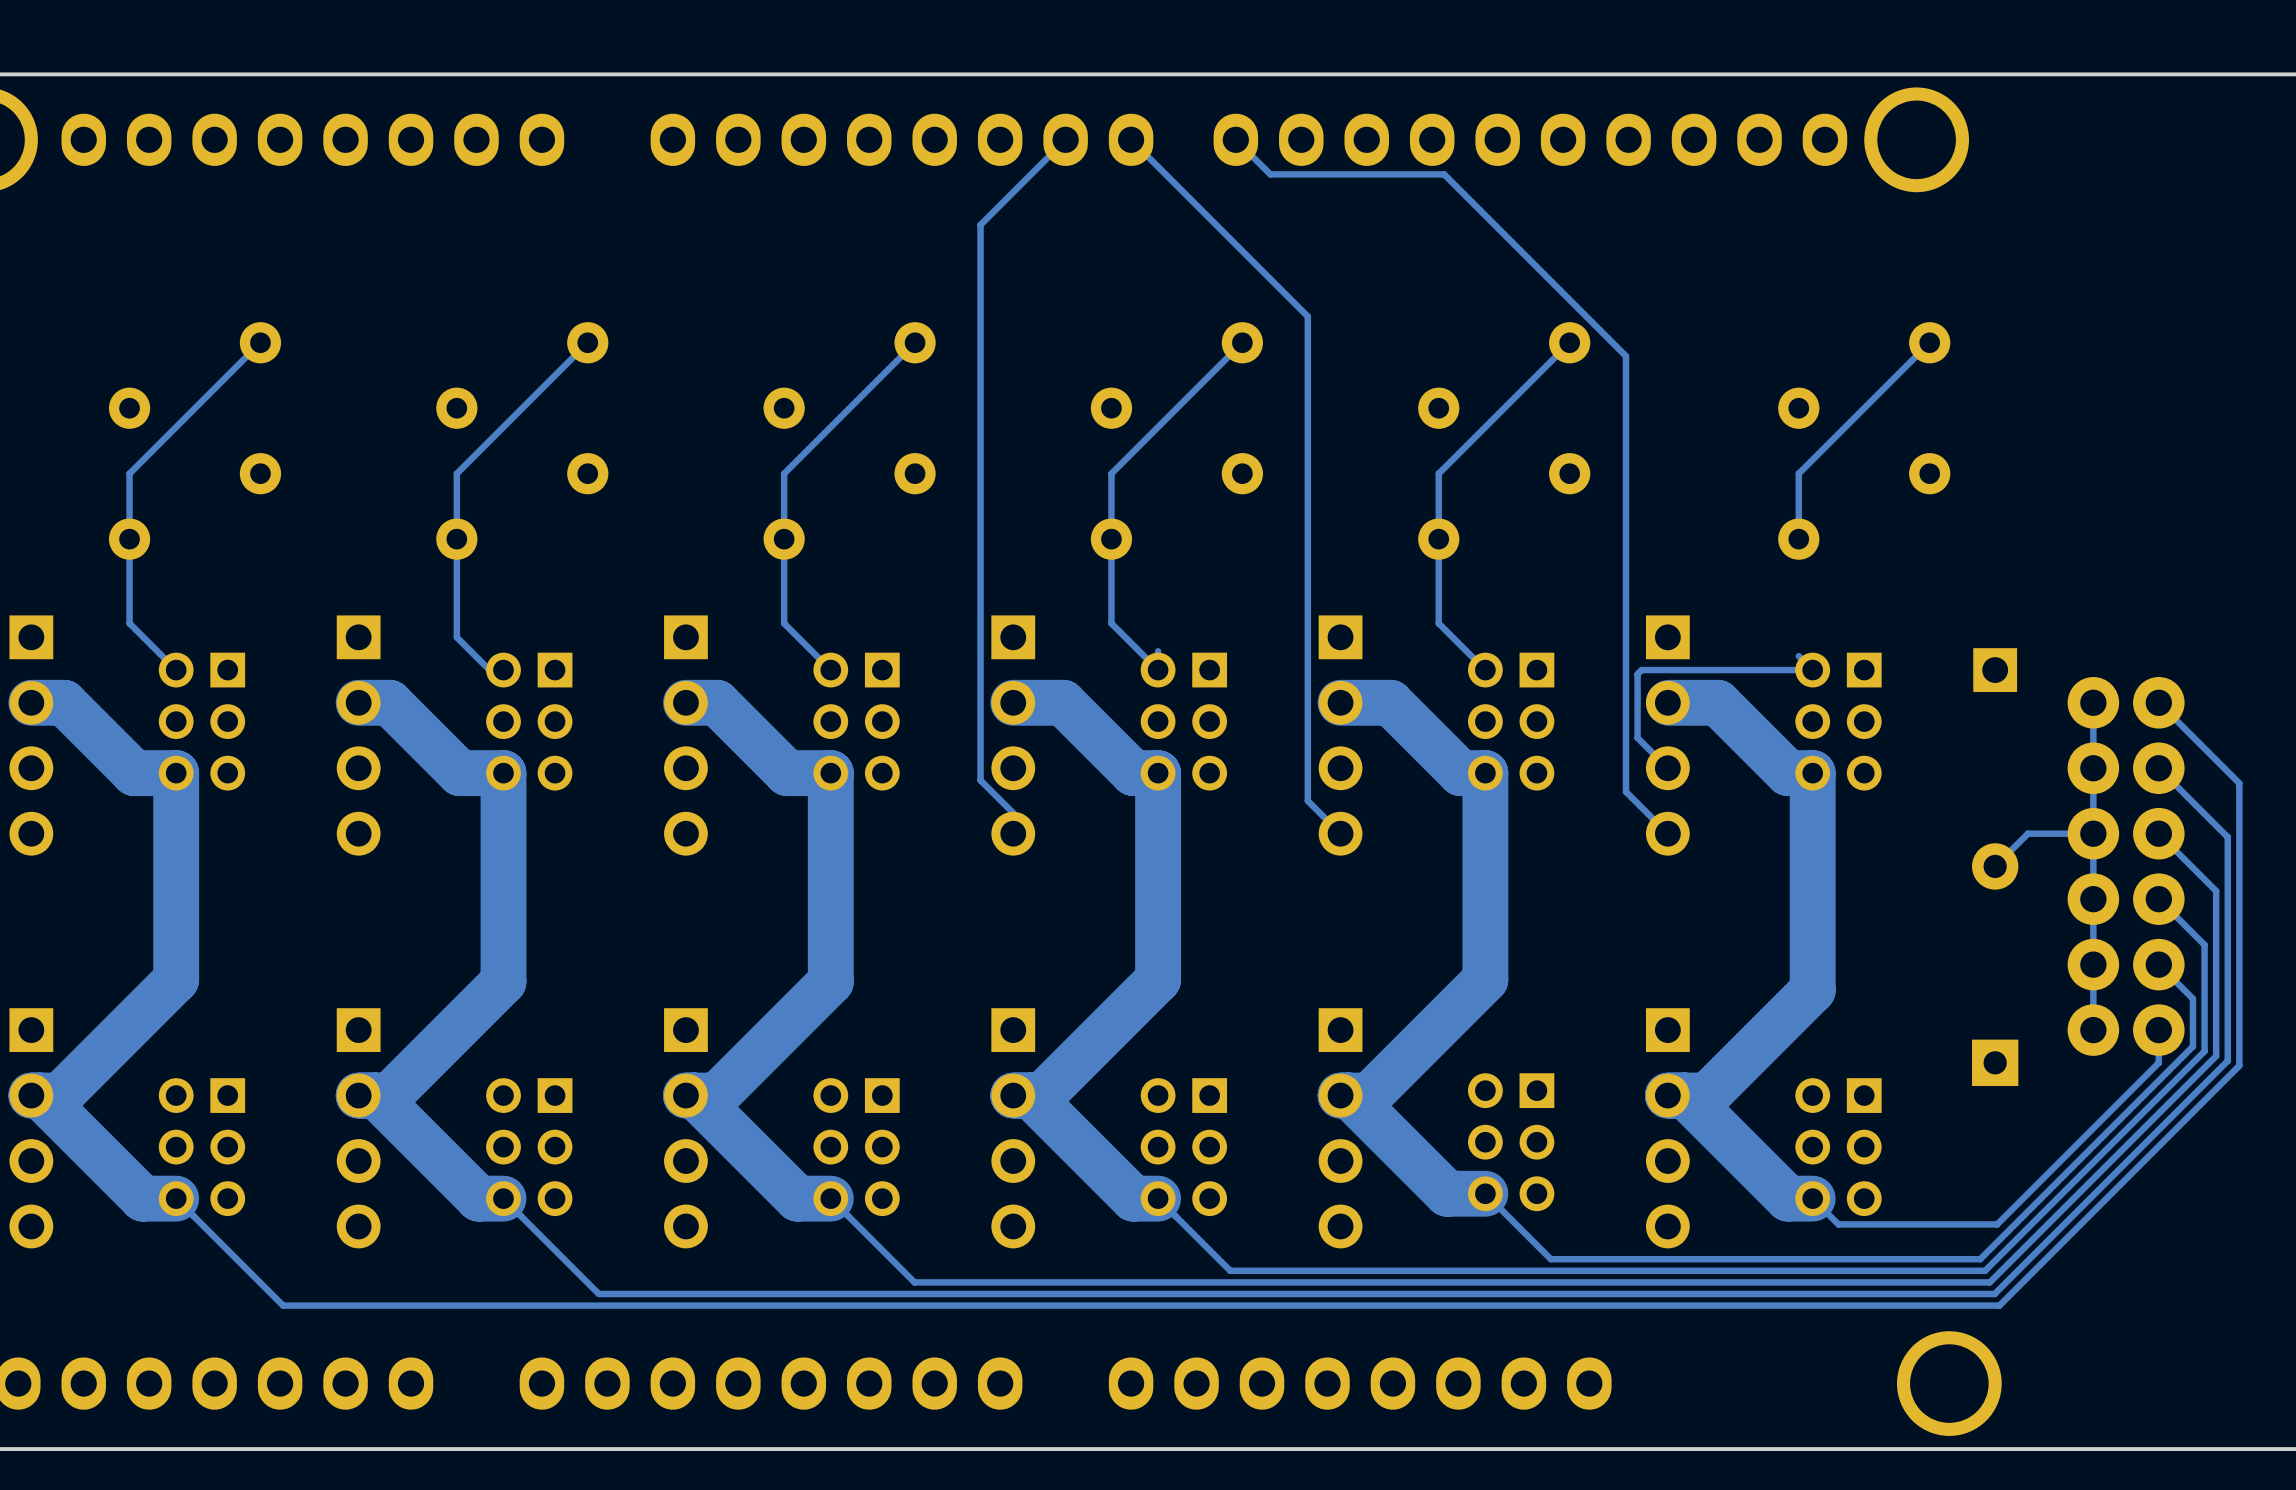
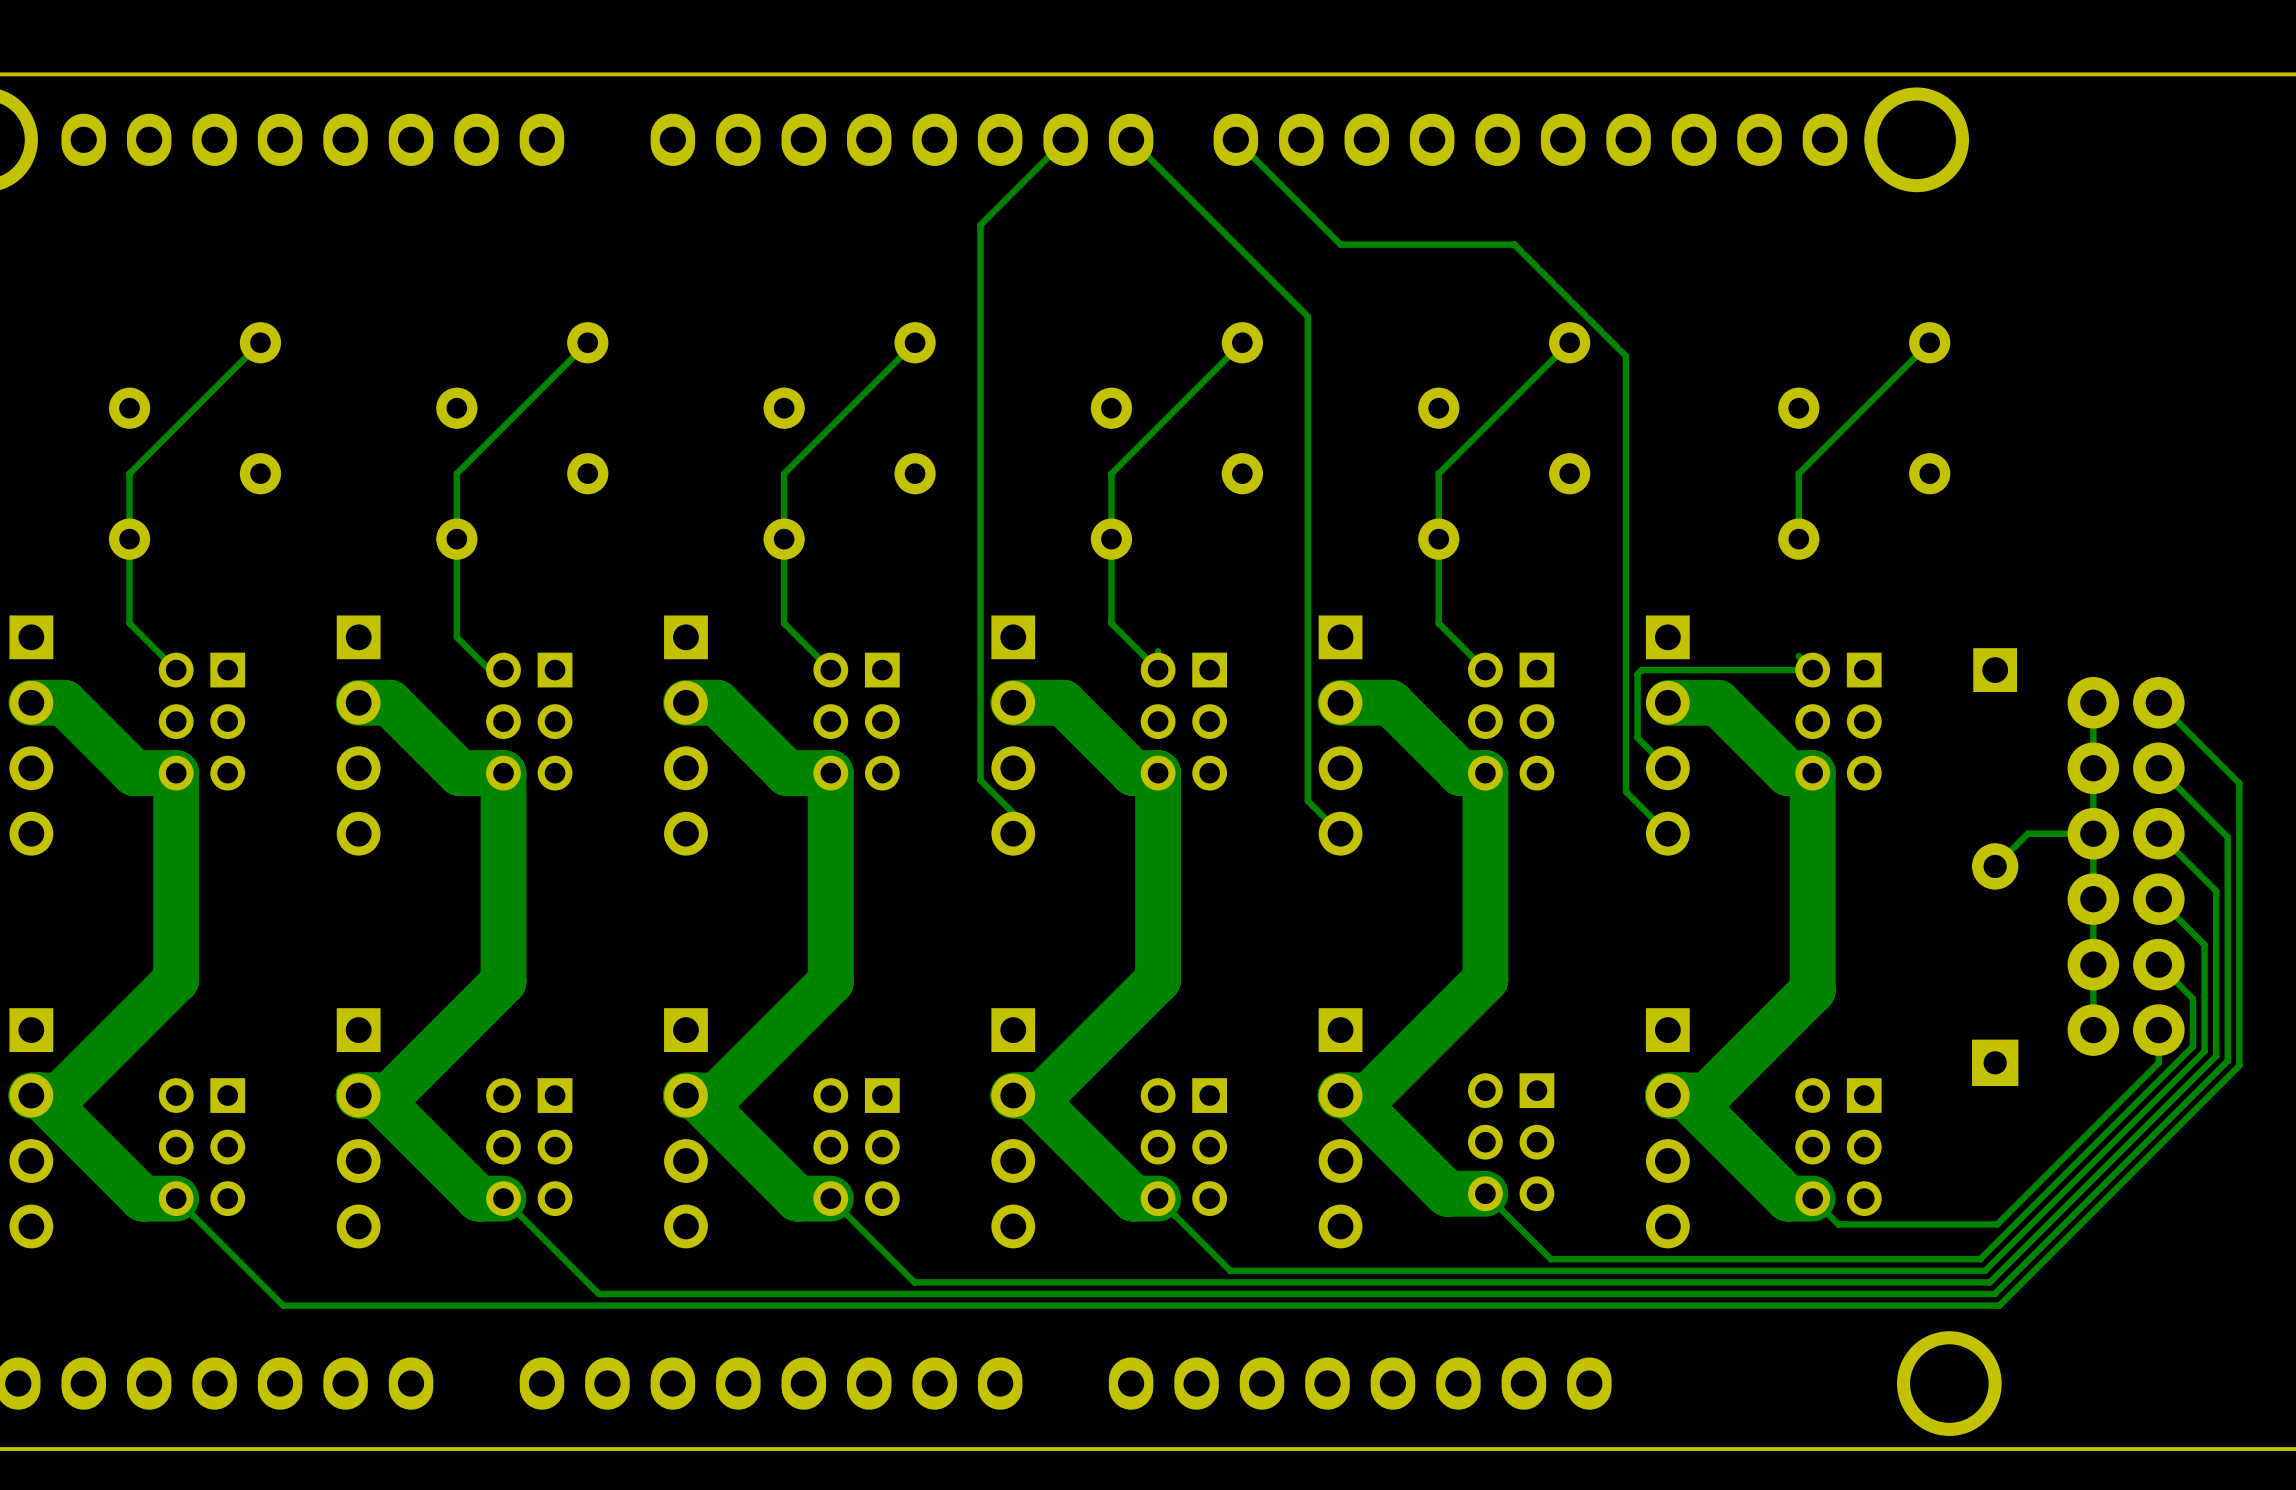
track: (1270, 174) (1444, 174) (1514, 244) -> (1270, 174) (1340, 244) (1514, 244)

